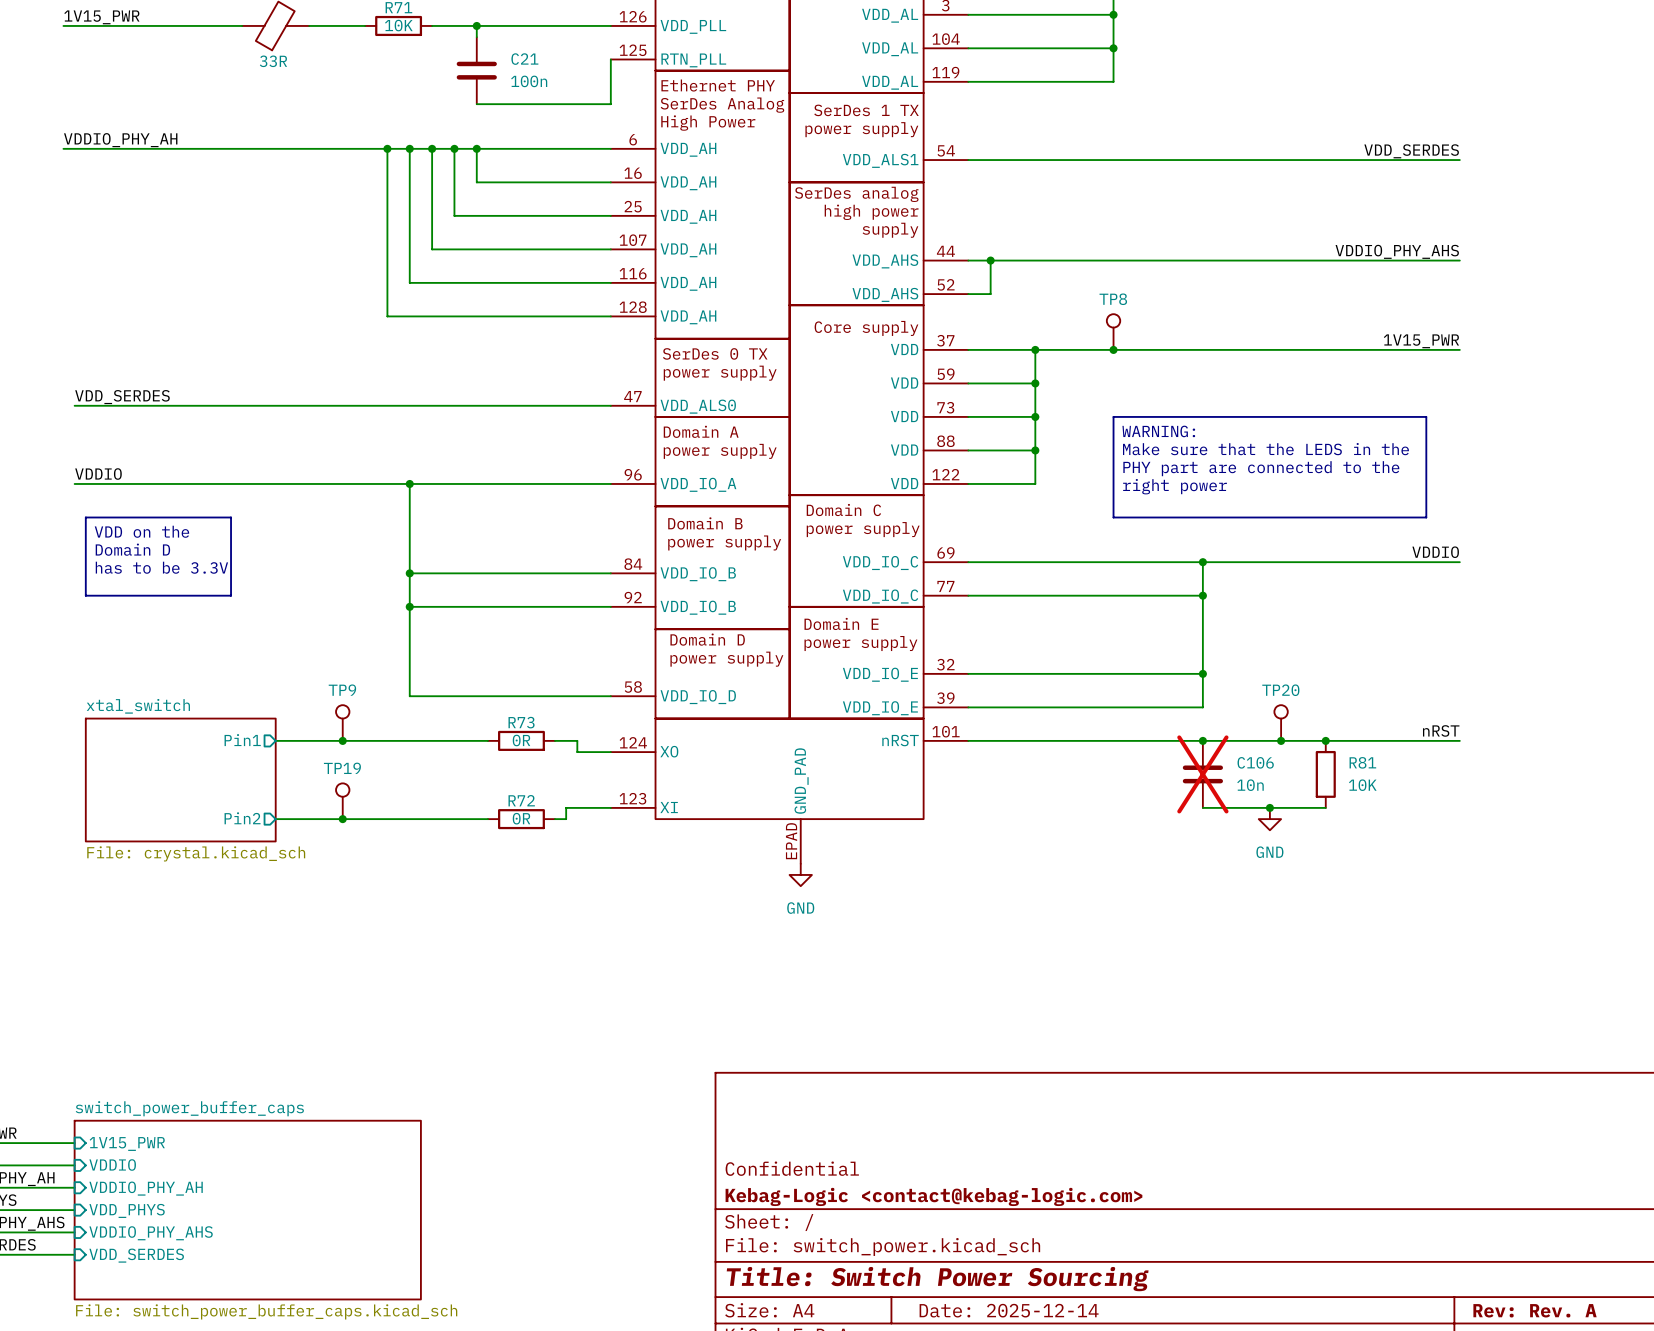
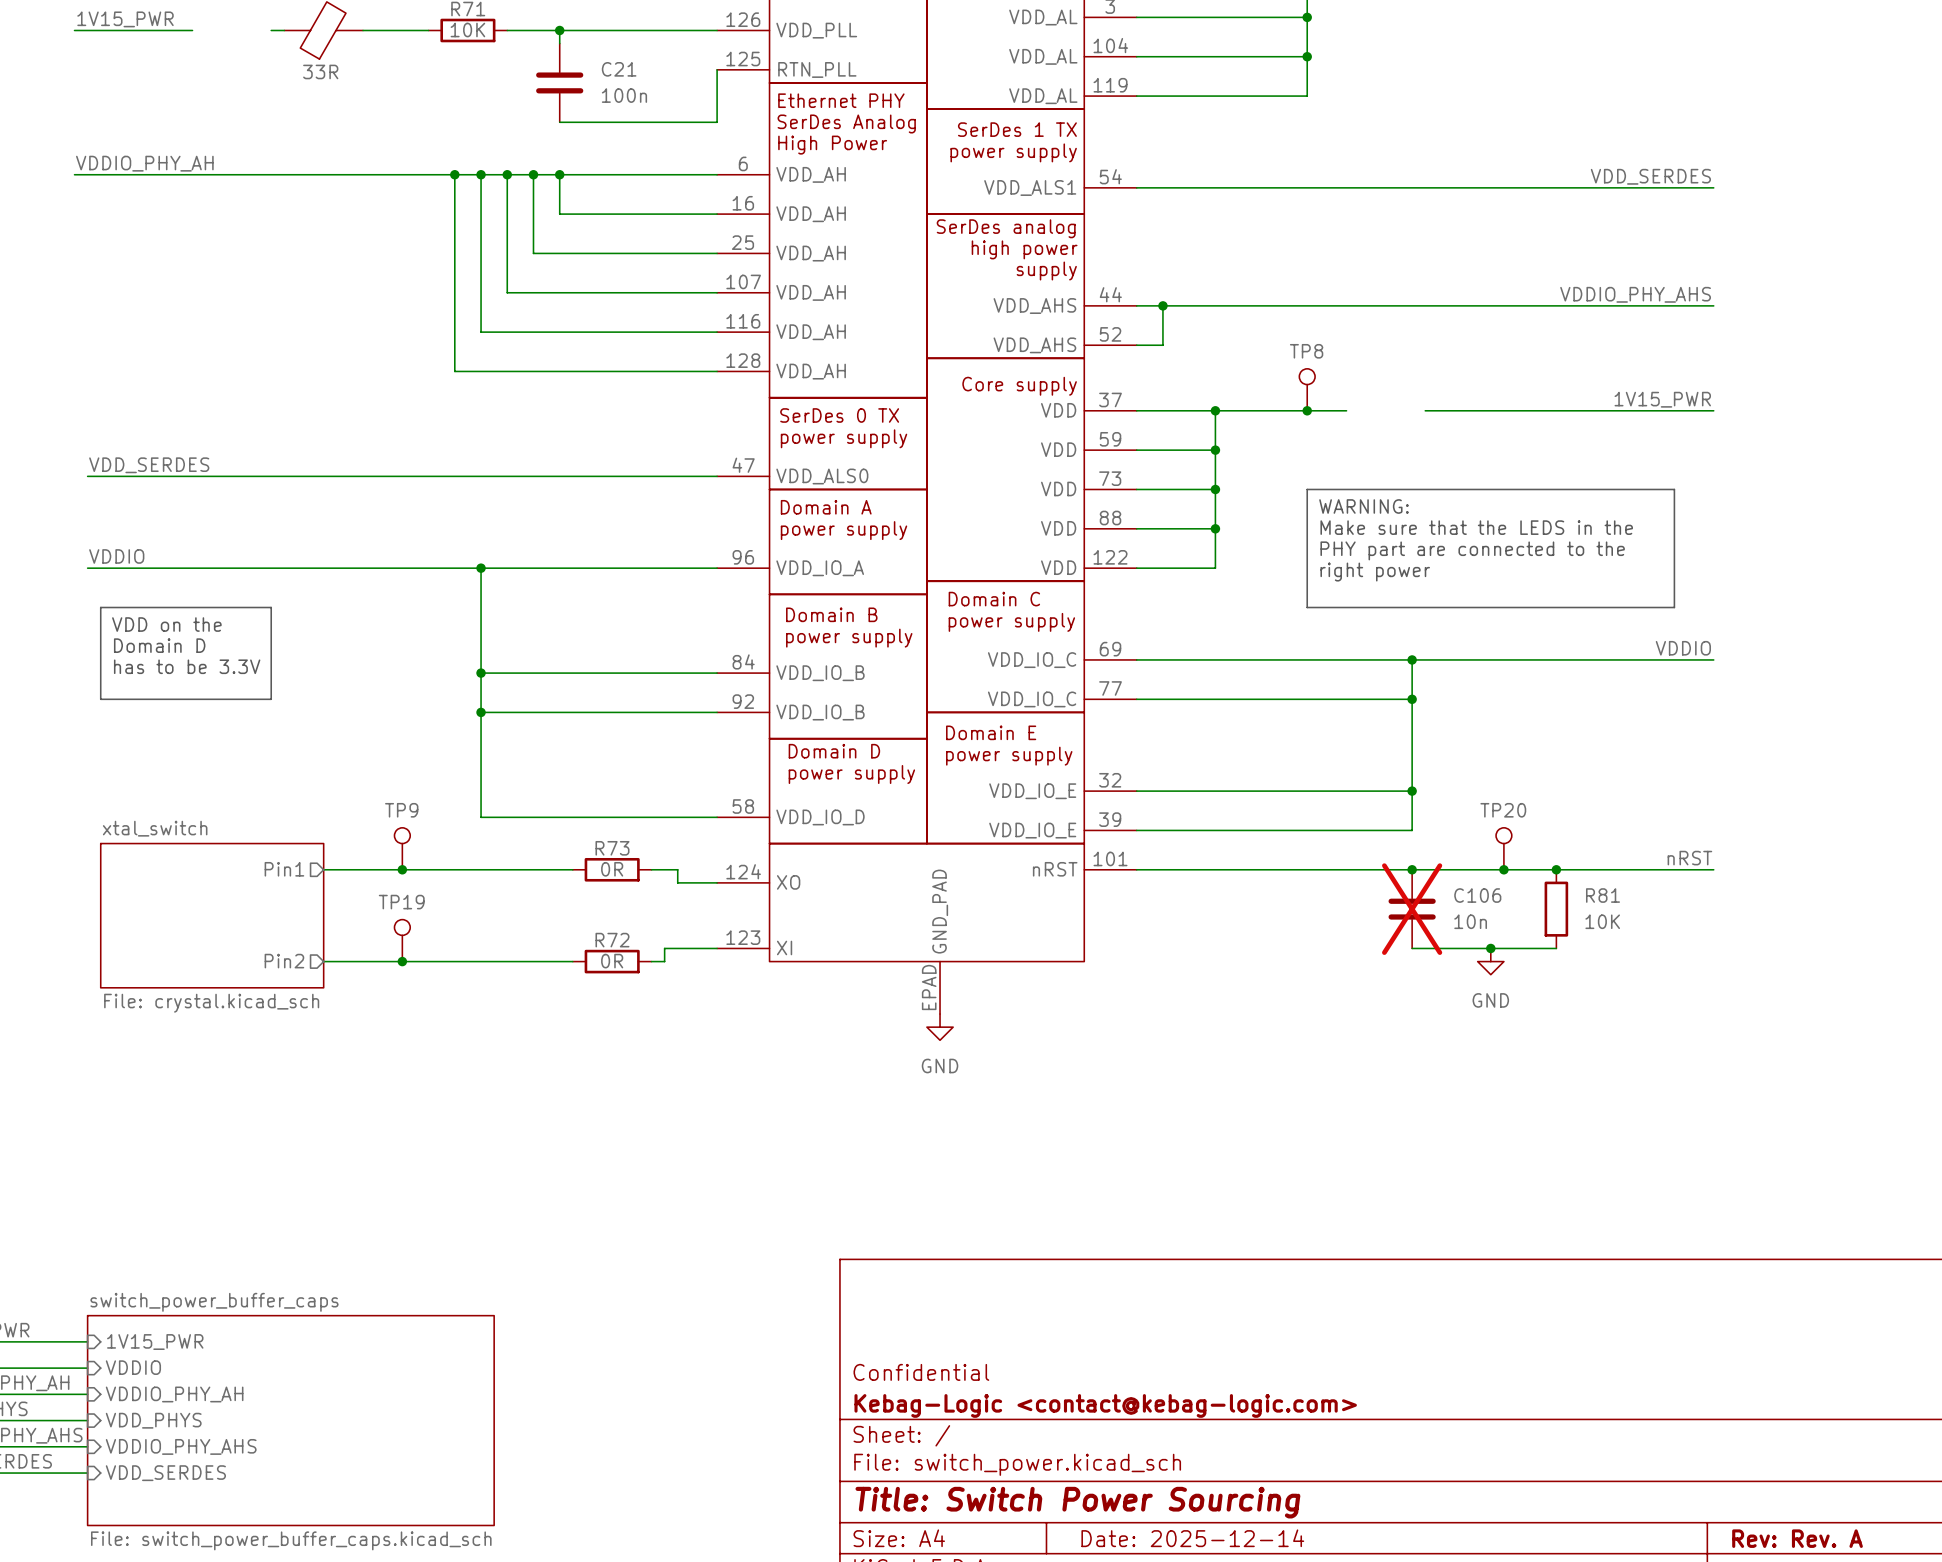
wire: (164, 25) (231, 25) -> none
wire: (1147, 349) (1214, 349) -> none

